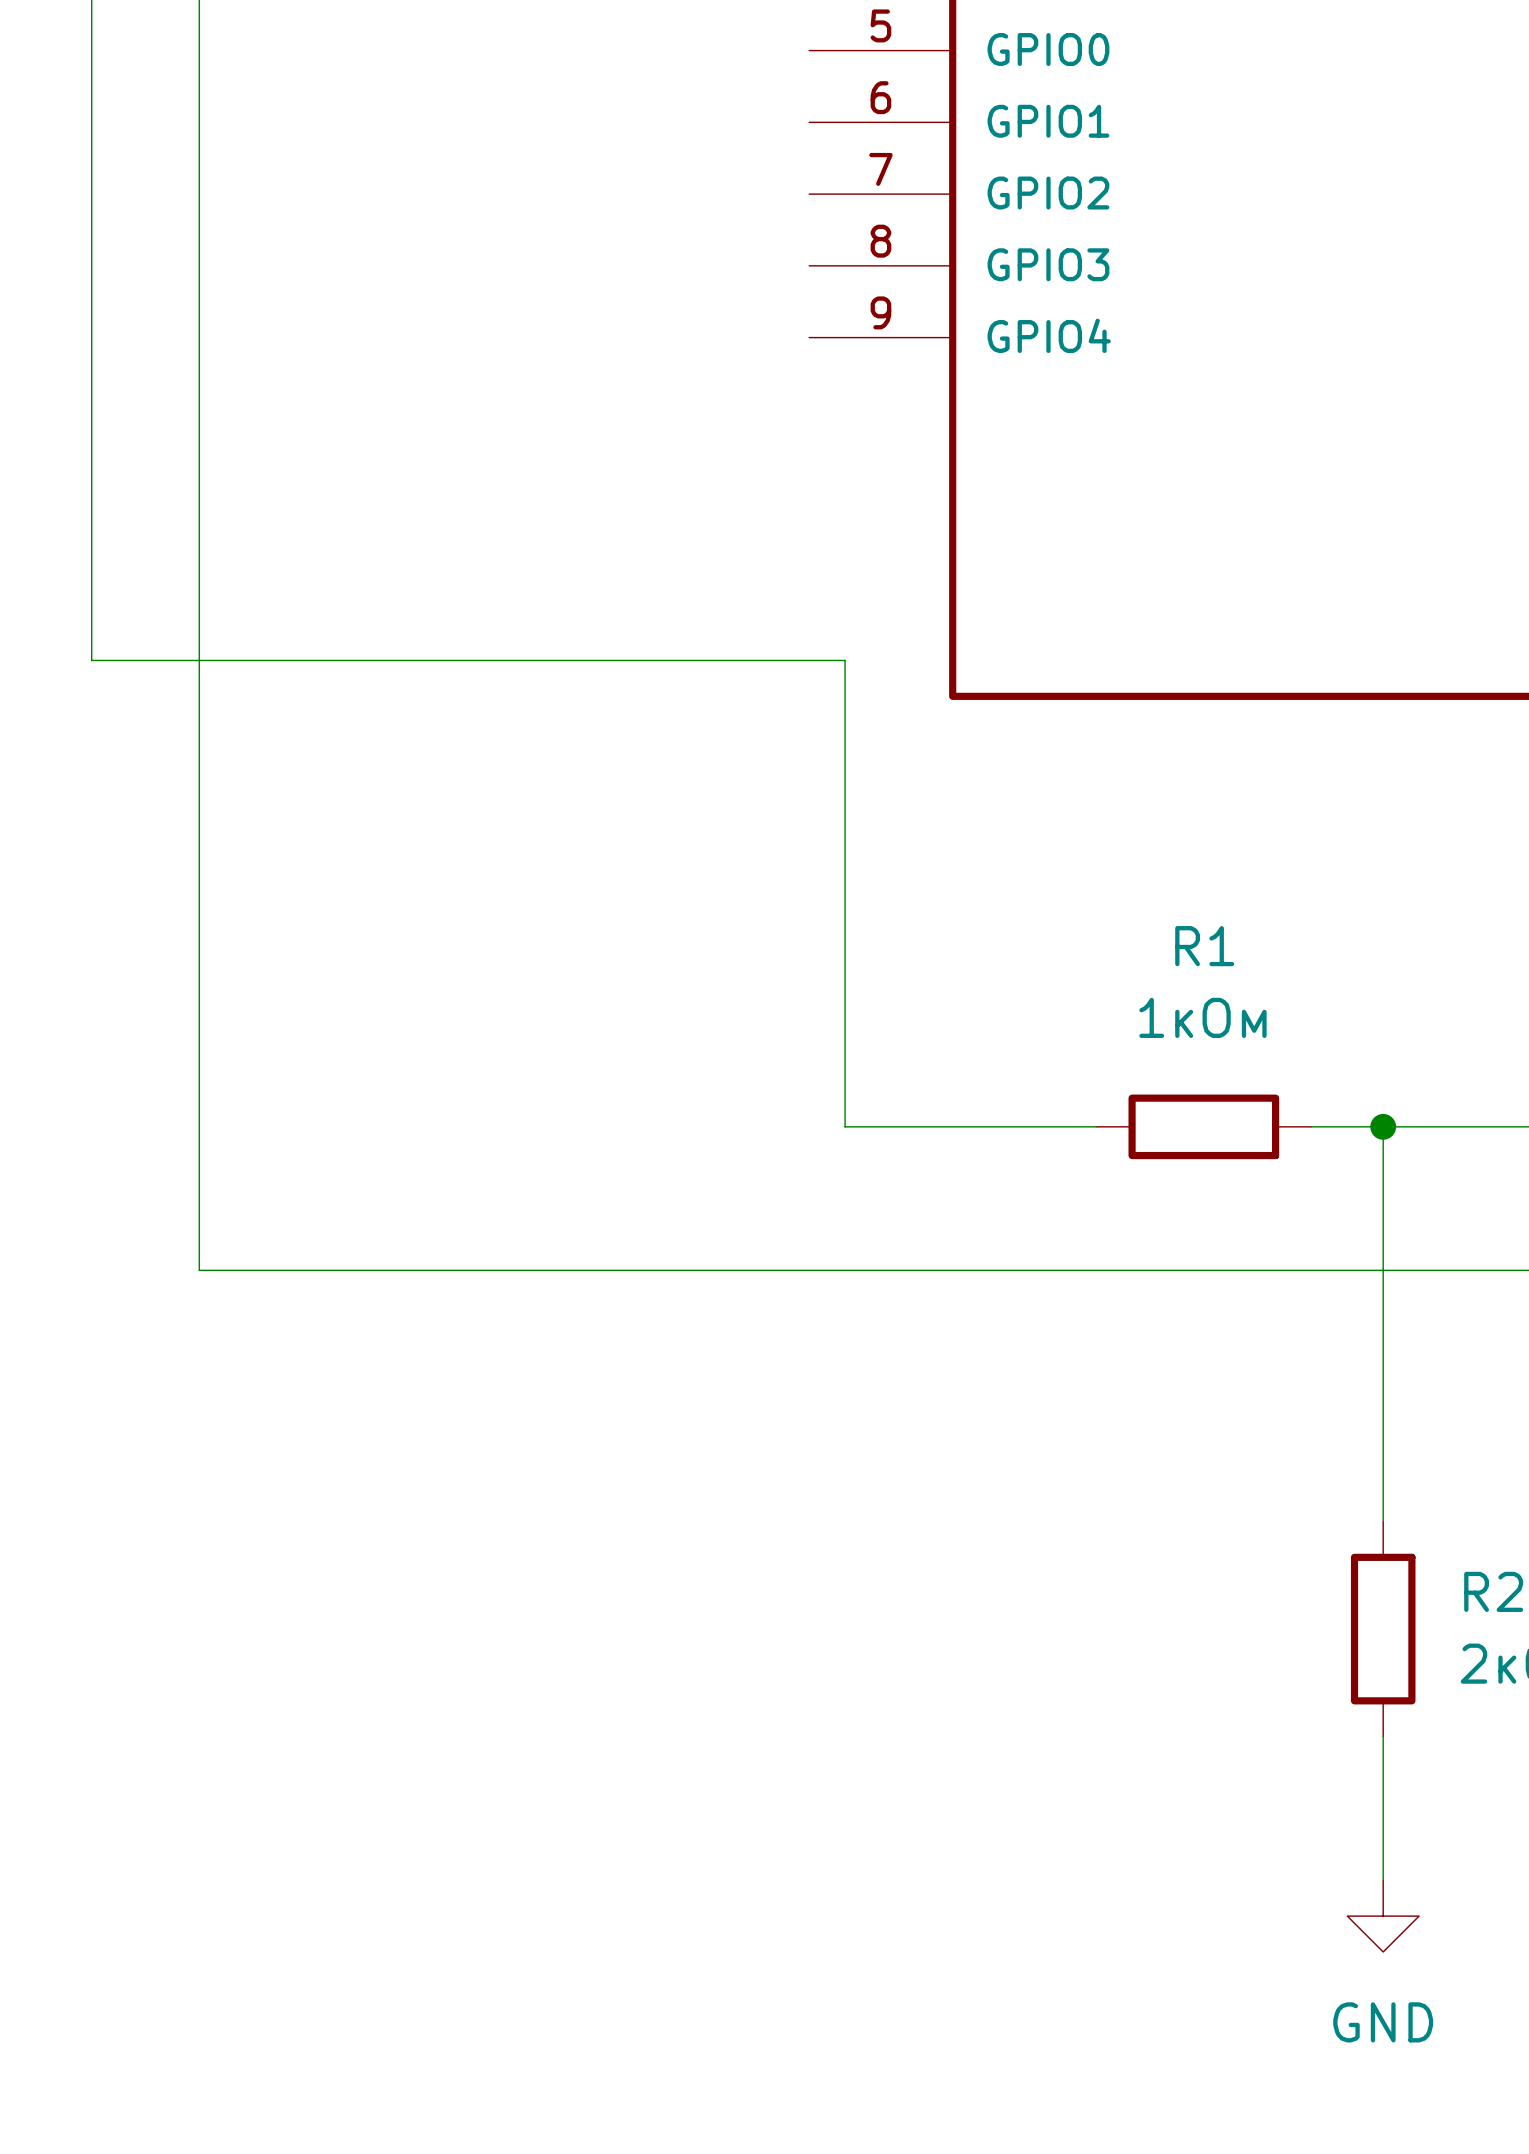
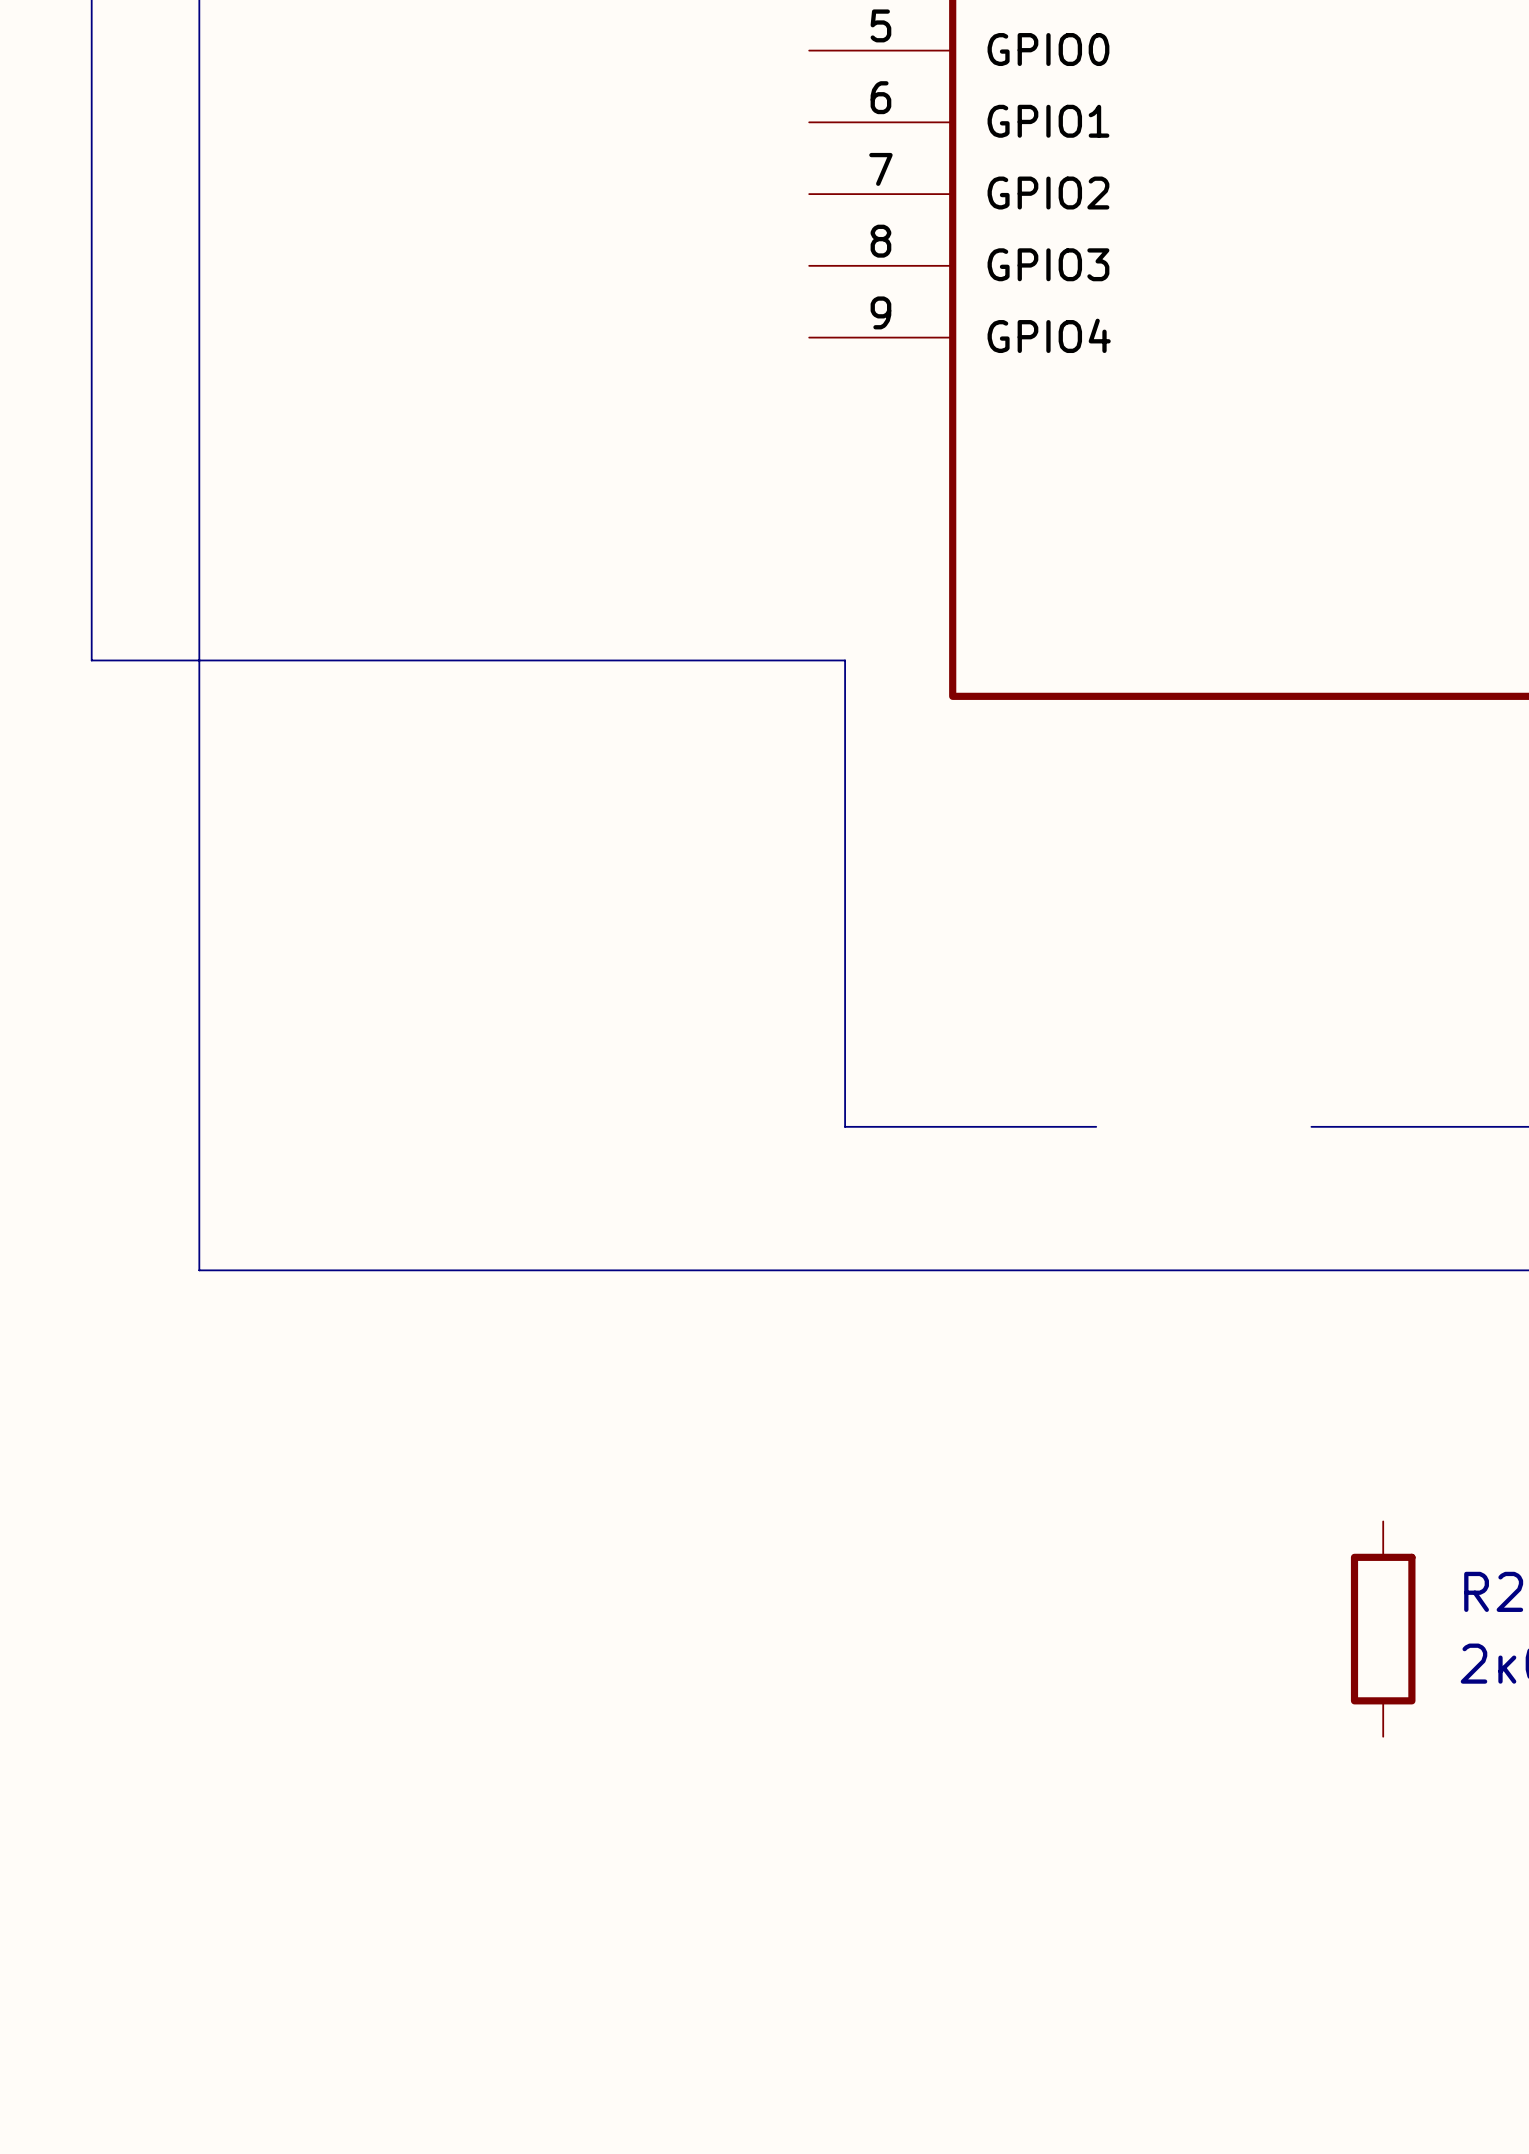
R1: 1кОм (1203, 1126) -> none
wire: (1383, 1126) (1383, 1521) -> none
junction: (1383, 1126) -> none
wire: (1383, 1736) (1383, 1880) -> none
power symbol: GND (1383, 1916) -> none

